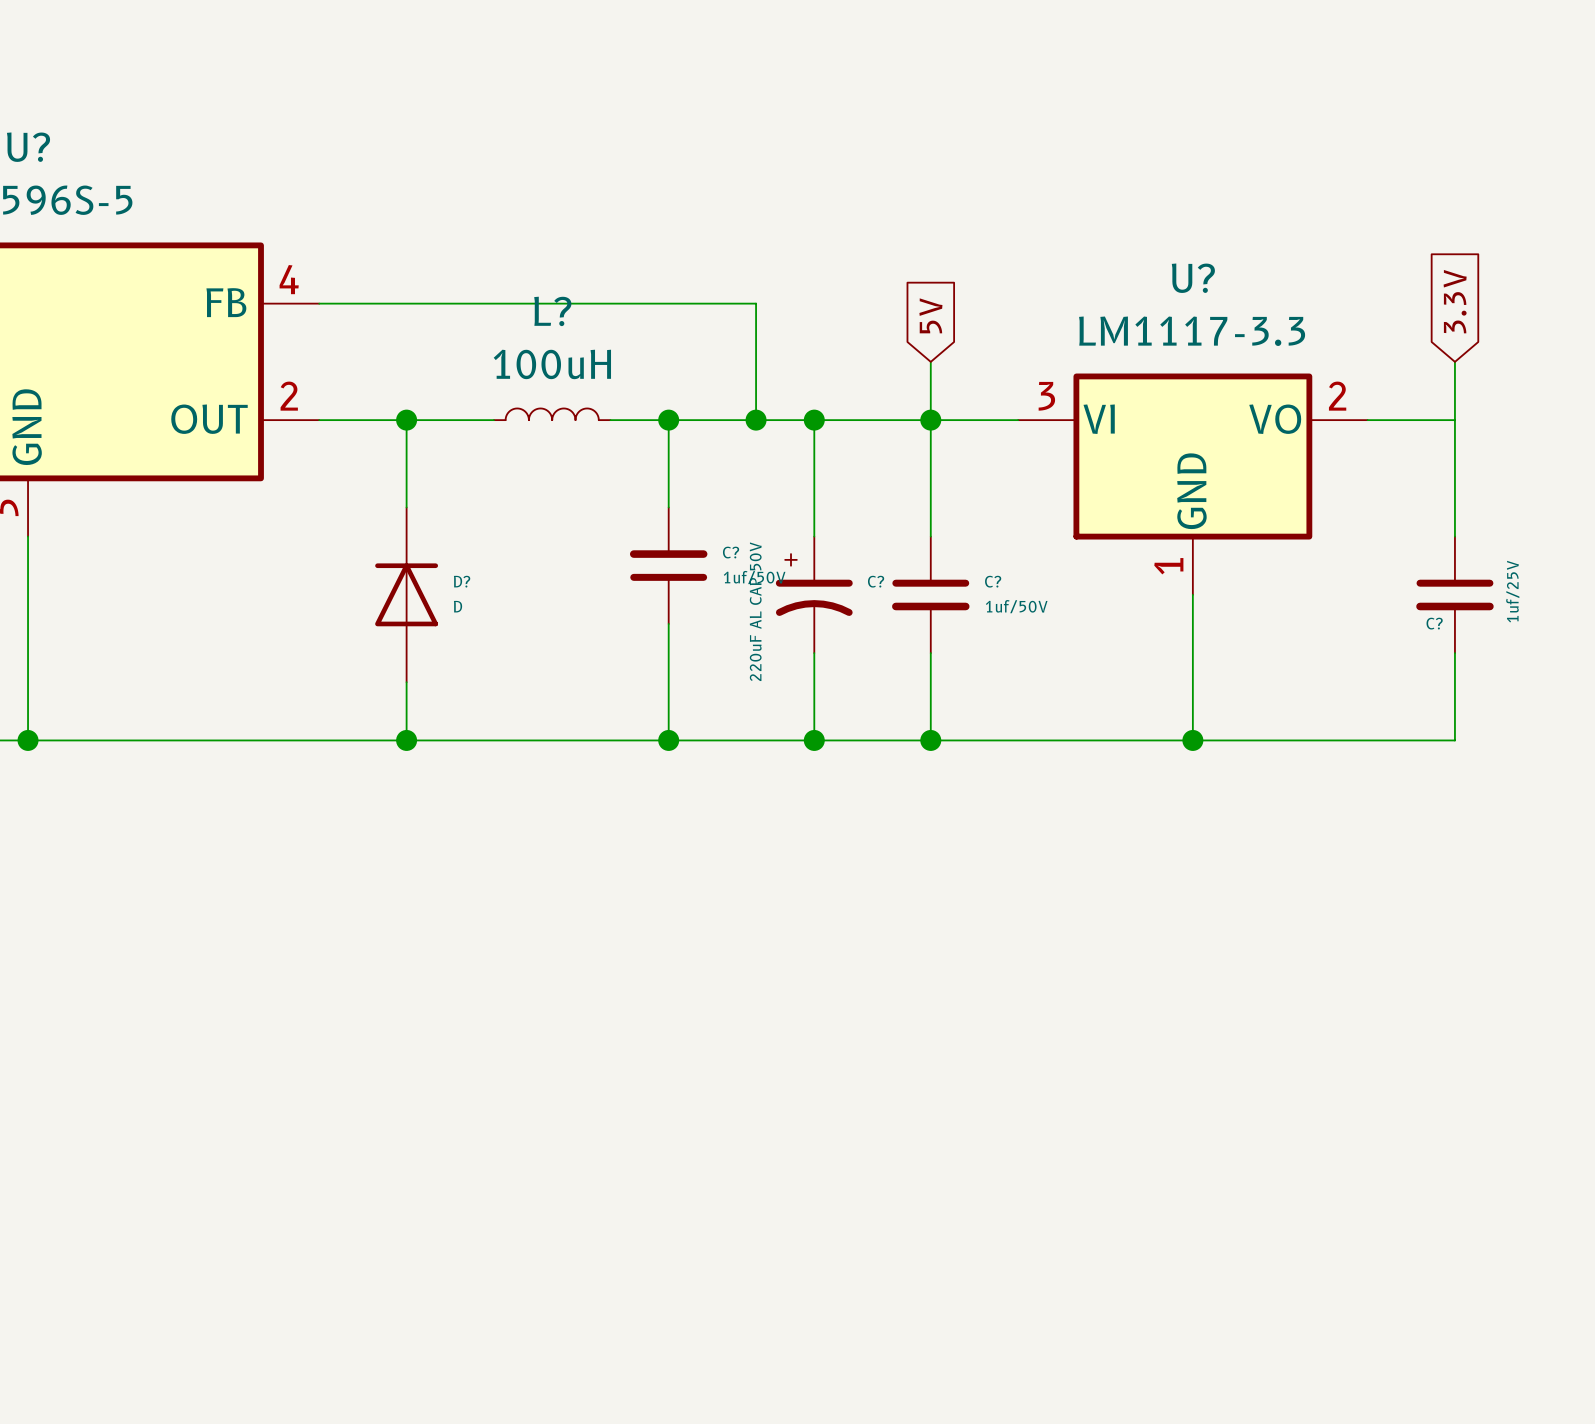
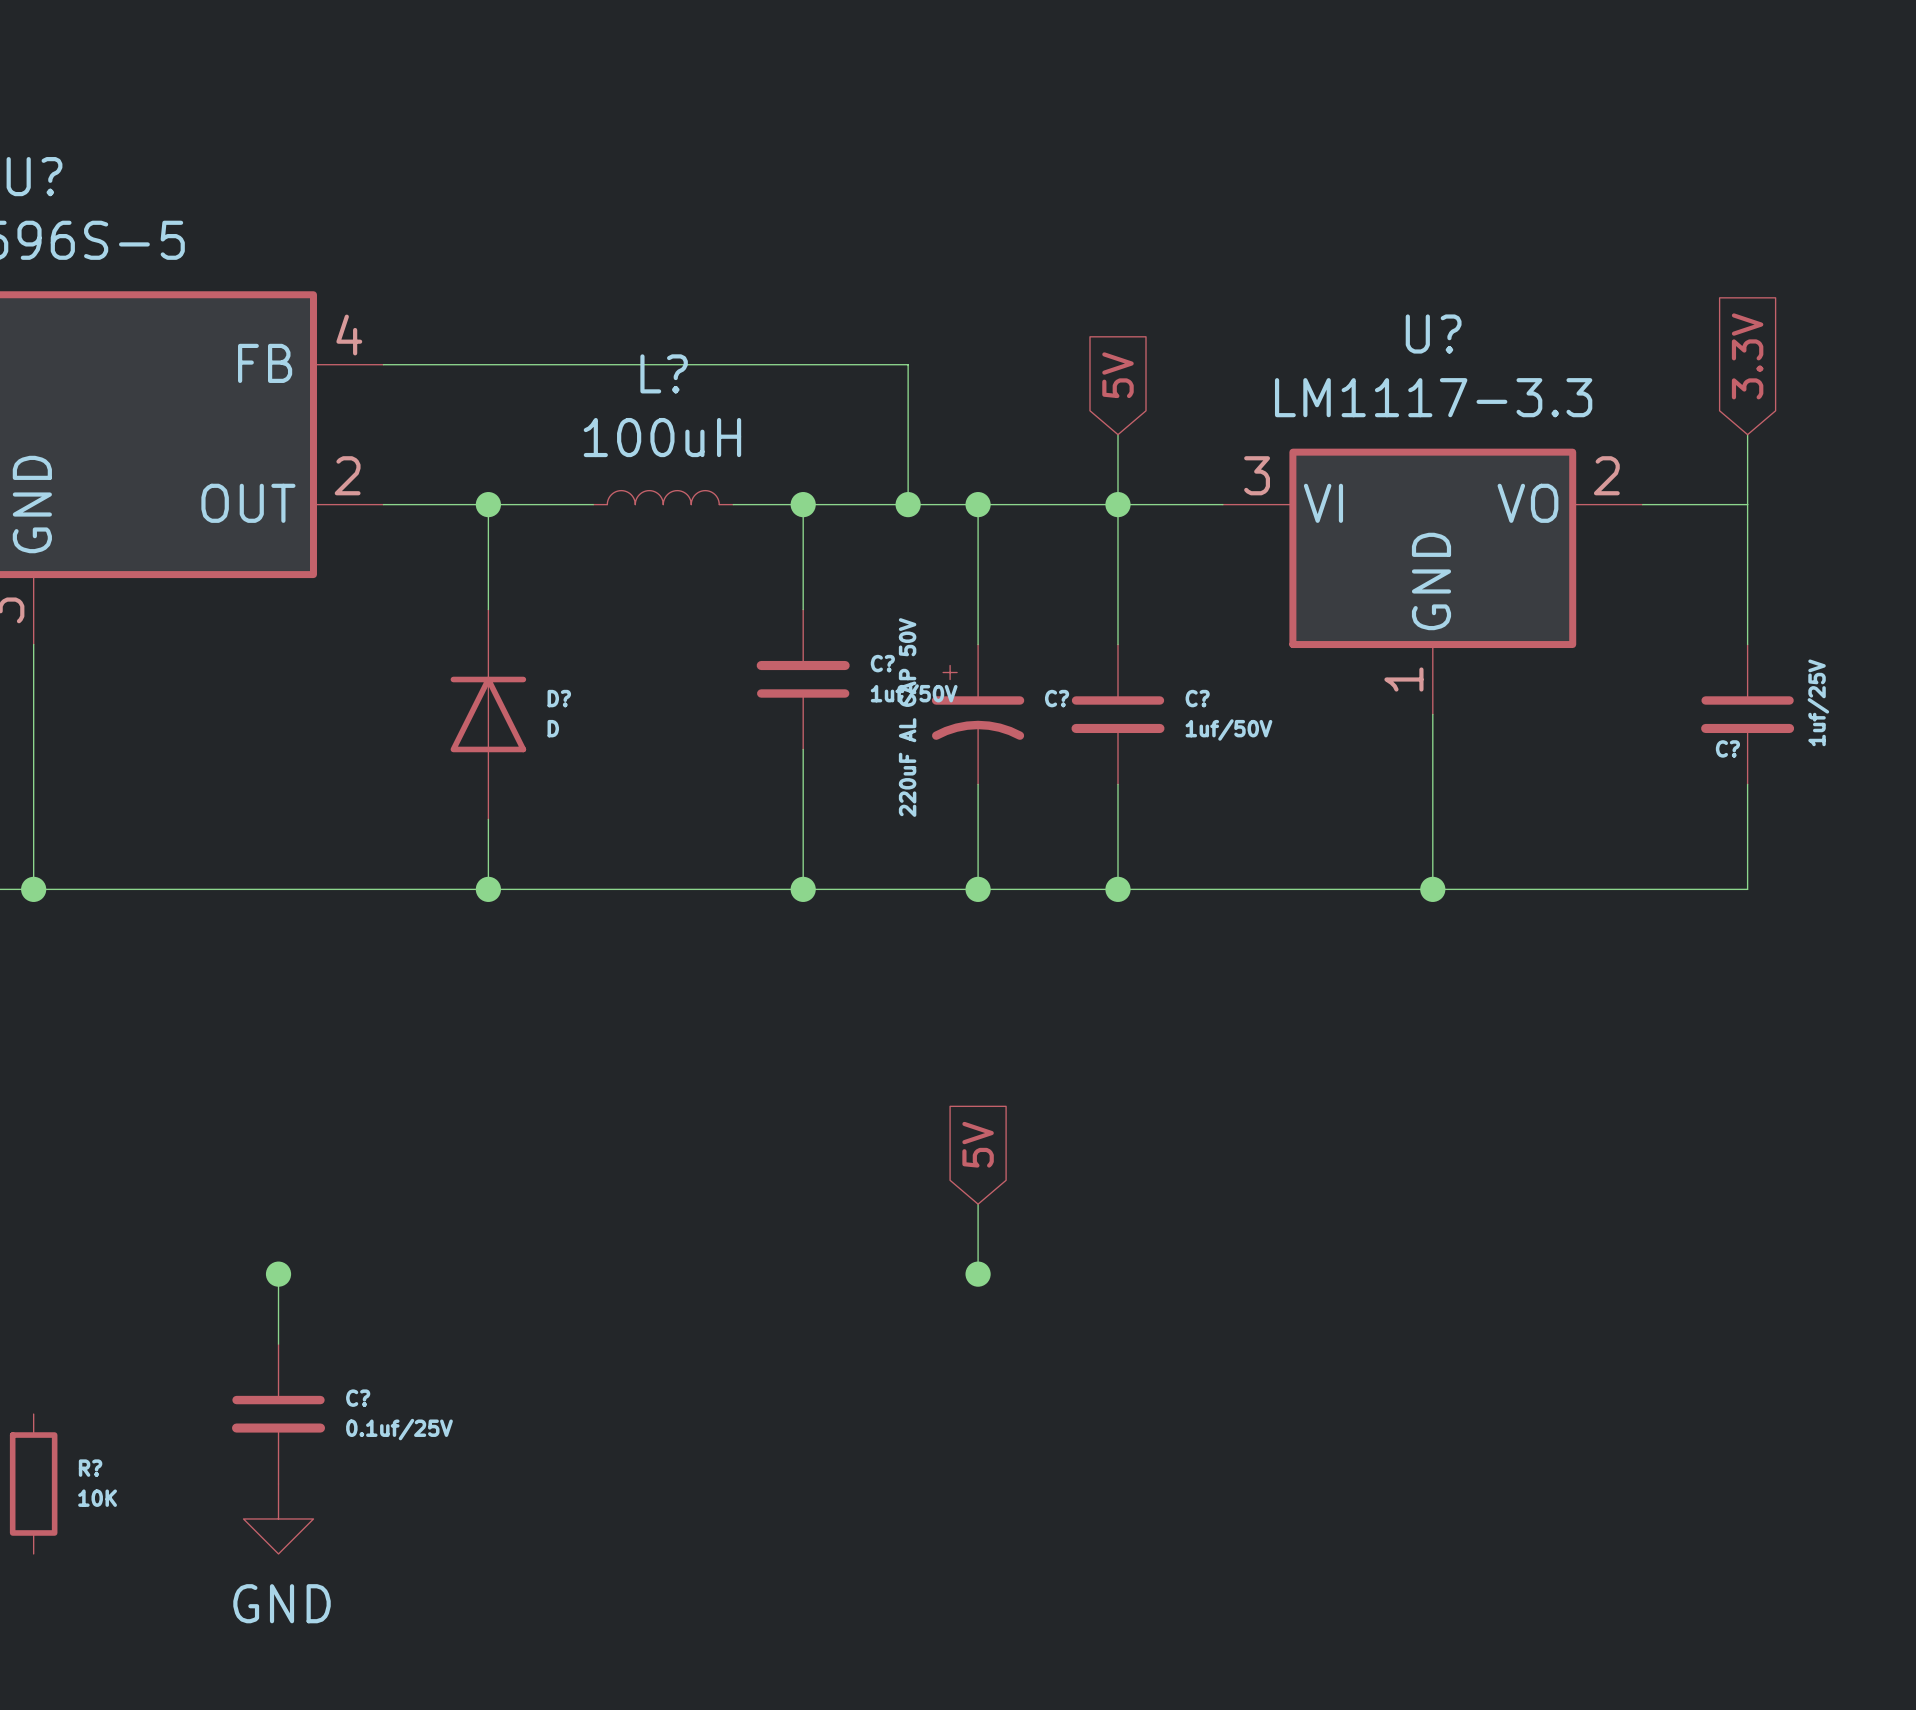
global label: none -> 5V (978, 1144)
wire: none -> (978, 1204) (978, 1274)
wire: none -> (278, 1274) (278, 1344)
junction: none -> (278, 1274)
junction: none -> (978, 1274)
C?: none -> 0.1uf/25V (278, 1414)
R?: none -> 10K (33, 1484)
power symbol: none -> GND (278, 1518)

